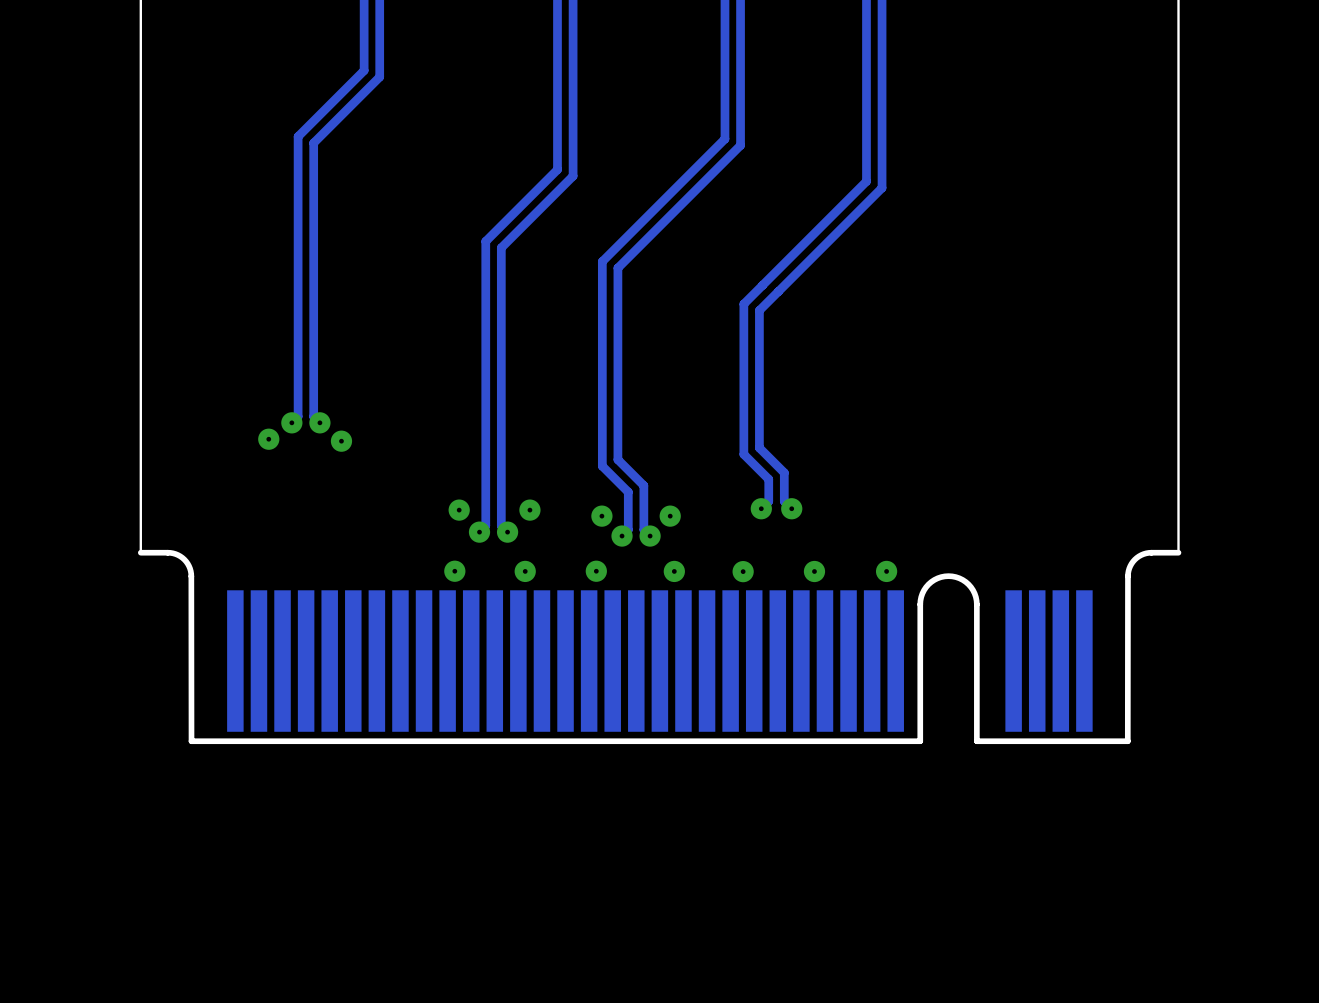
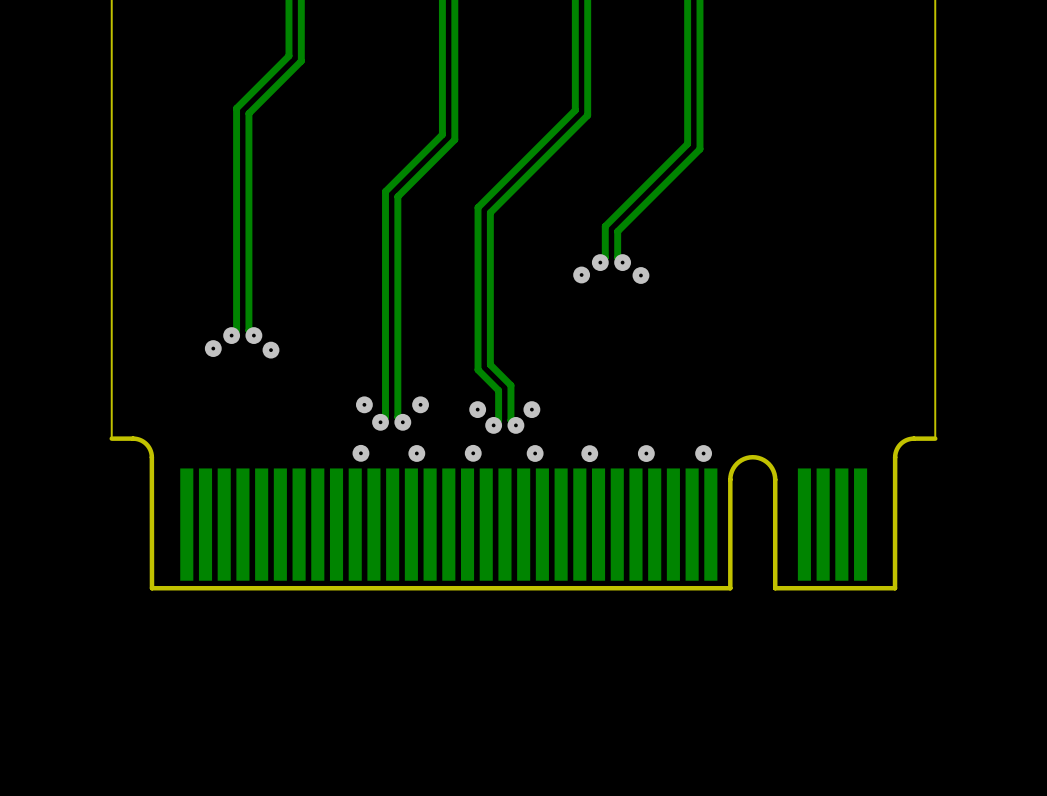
track: (762, 285) (743, 304) (743, 454) (768, 479) (768, 501) (761, 508) -> (605, 226) (605, 257) (600, 262)
track: (778, 291) (759, 310) (759, 447) (784, 472) (784, 501) (791, 508) -> (617, 231) (617, 257) (622, 262)
via: none -> (600, 262)
via: none -> (622, 262)
via: none -> (581, 274)
via: none -> (640, 275)
via: (761, 508) -> none
via: (791, 508) -> none

